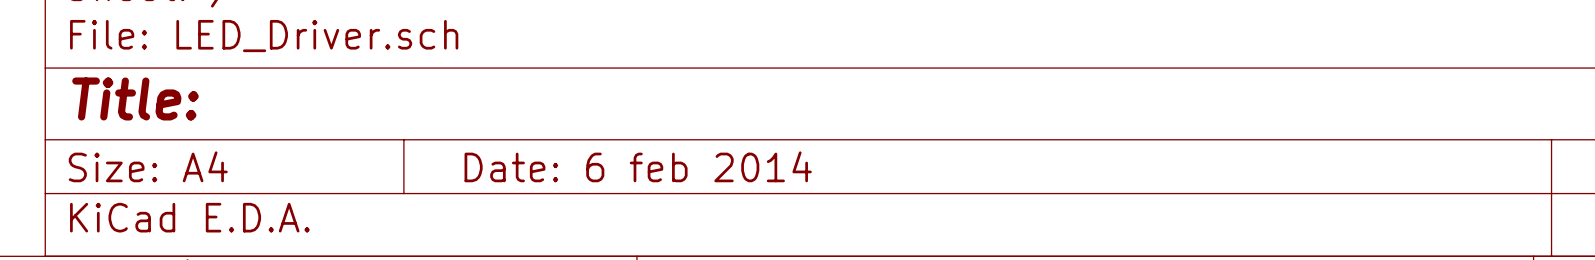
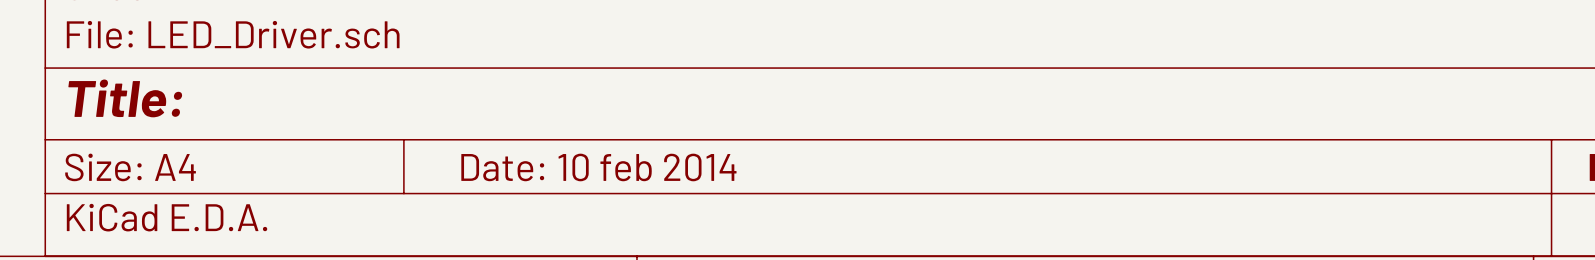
title block: Date: 6 feb 2014 (638, 166) -> Date: 10 feb 2014 (598, 167)

